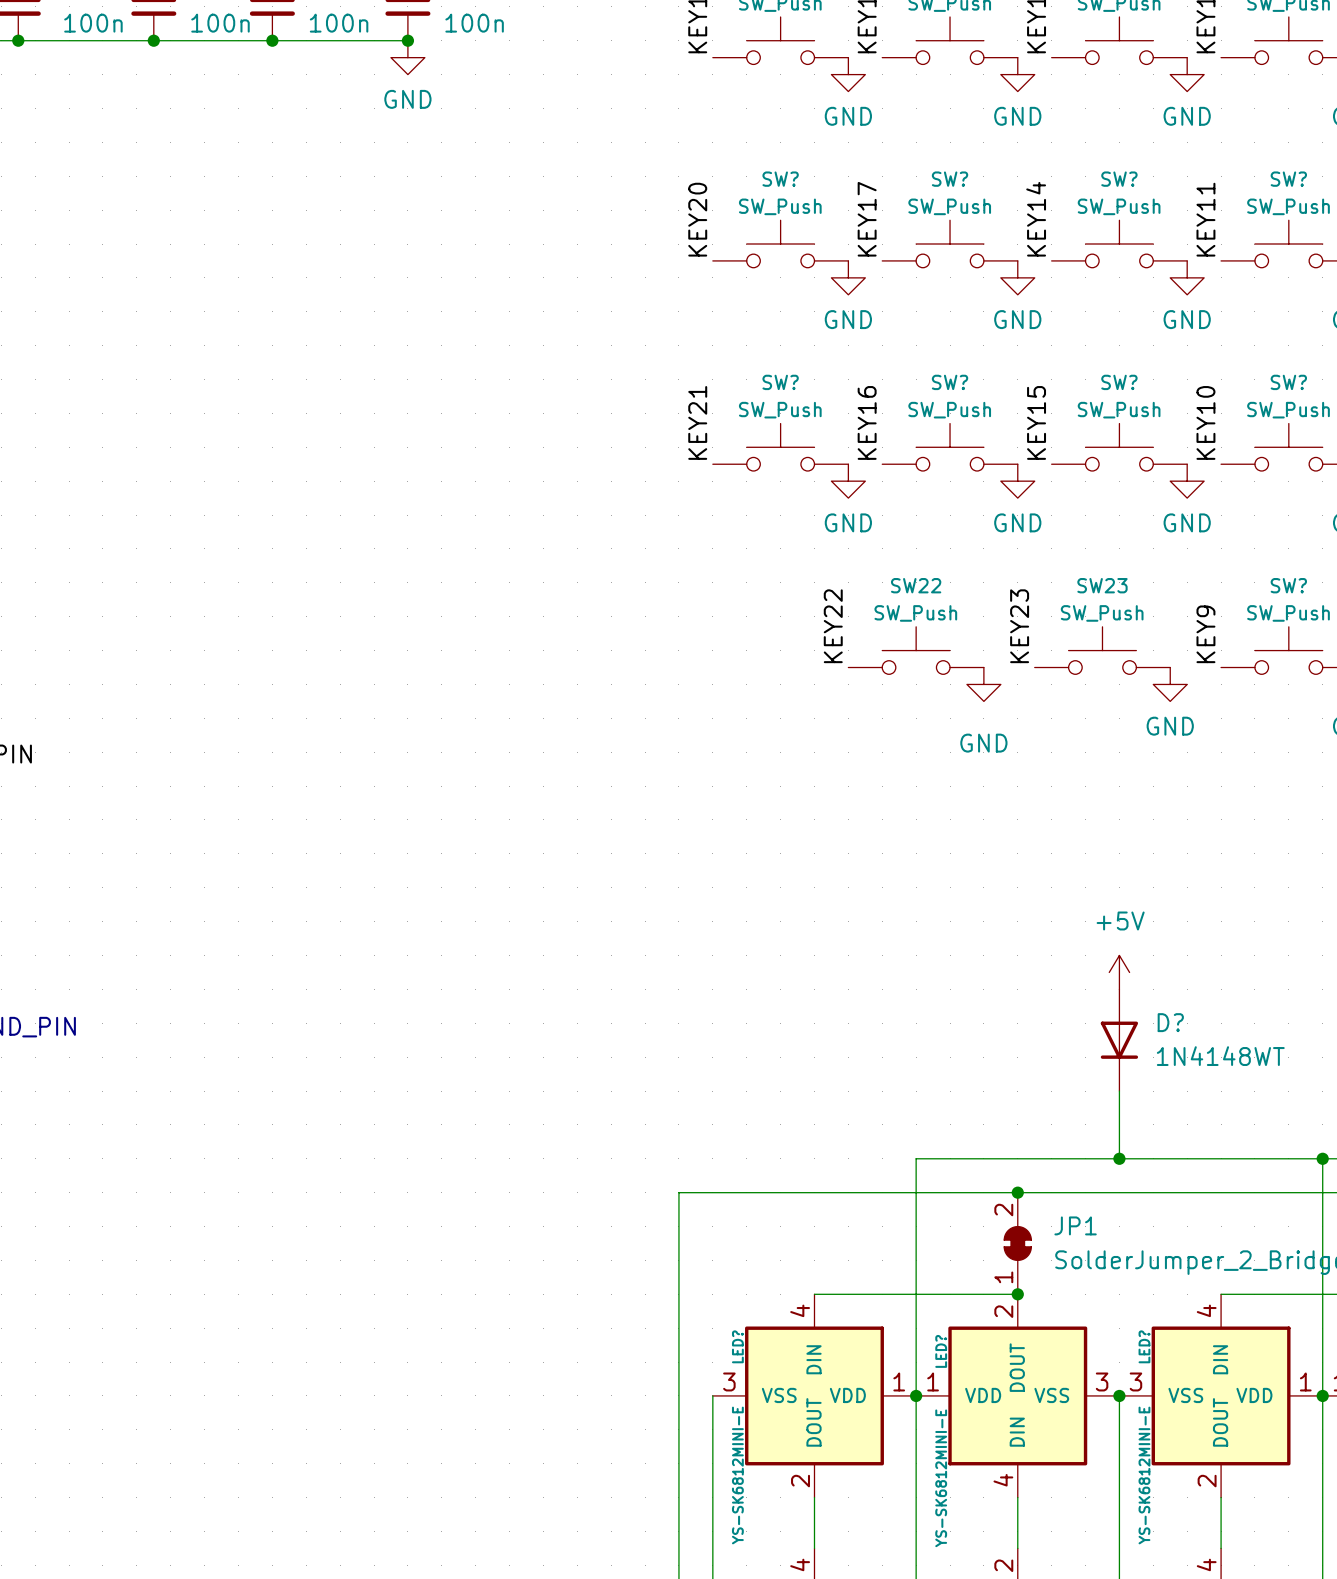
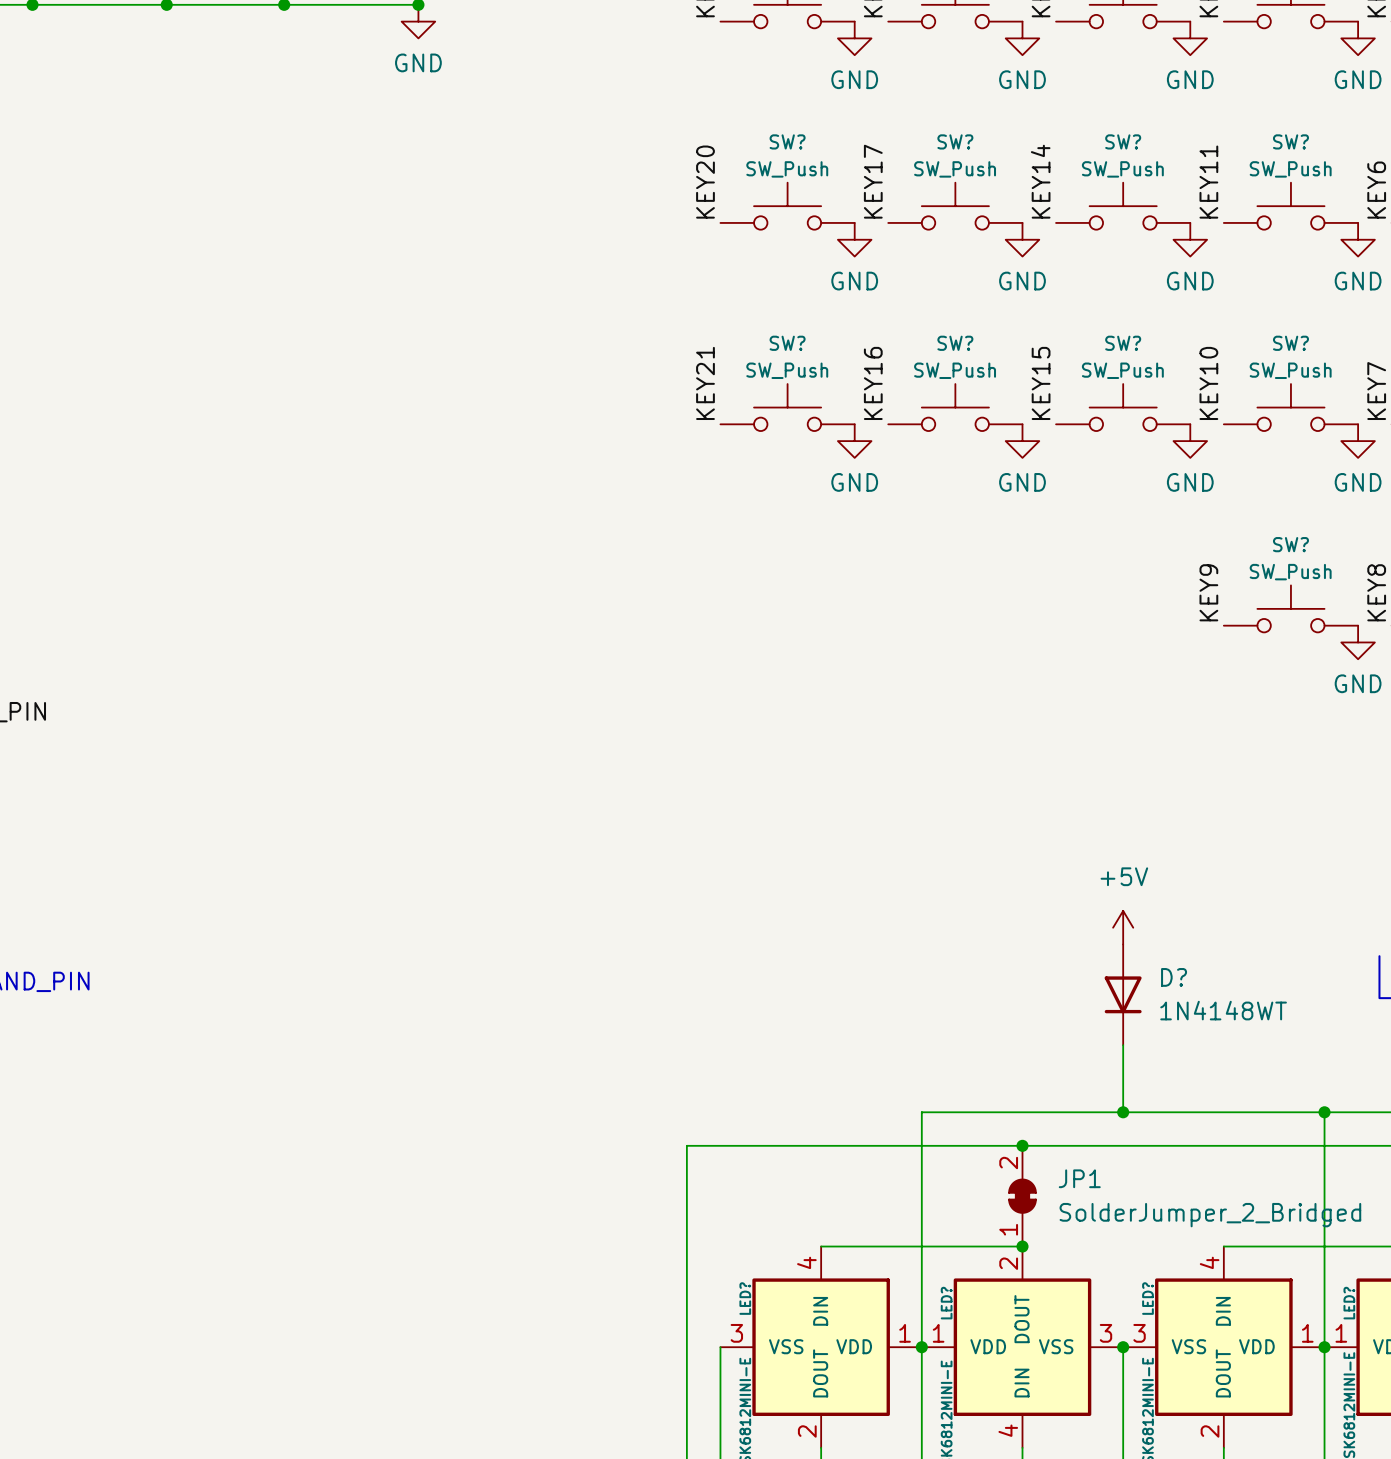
label: KEY22 (833, 626) -> none
label: KEY23 (1019, 626) -> none
SW22: SW_Push (916, 650) -> none
SW23: SW_Push (1102, 650) -> none
power symbol: GND (983, 684) -> none
power symbol: GND (1170, 684) -> none

